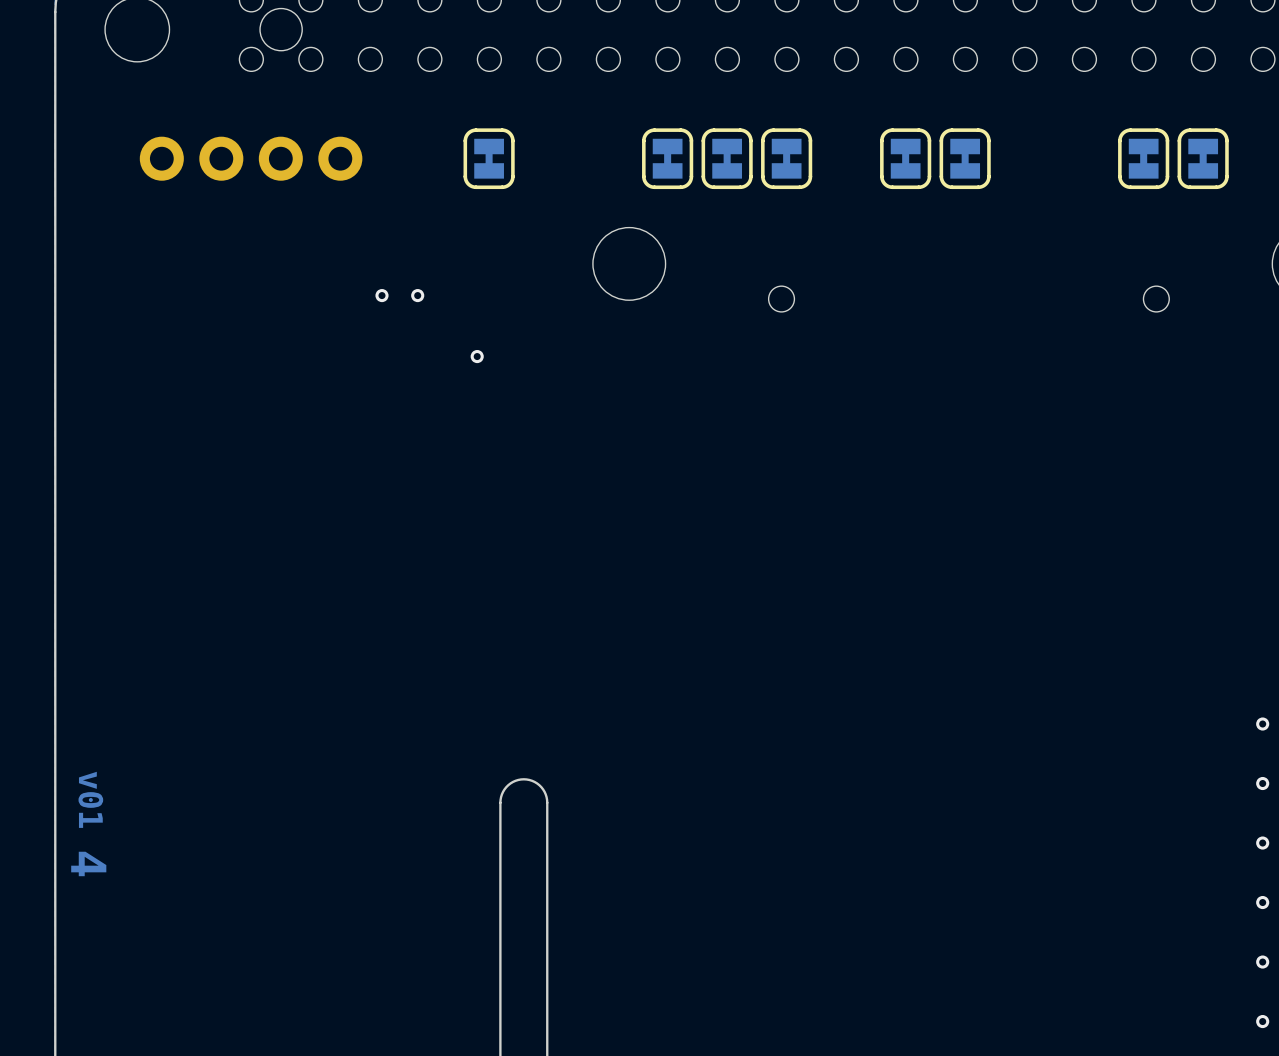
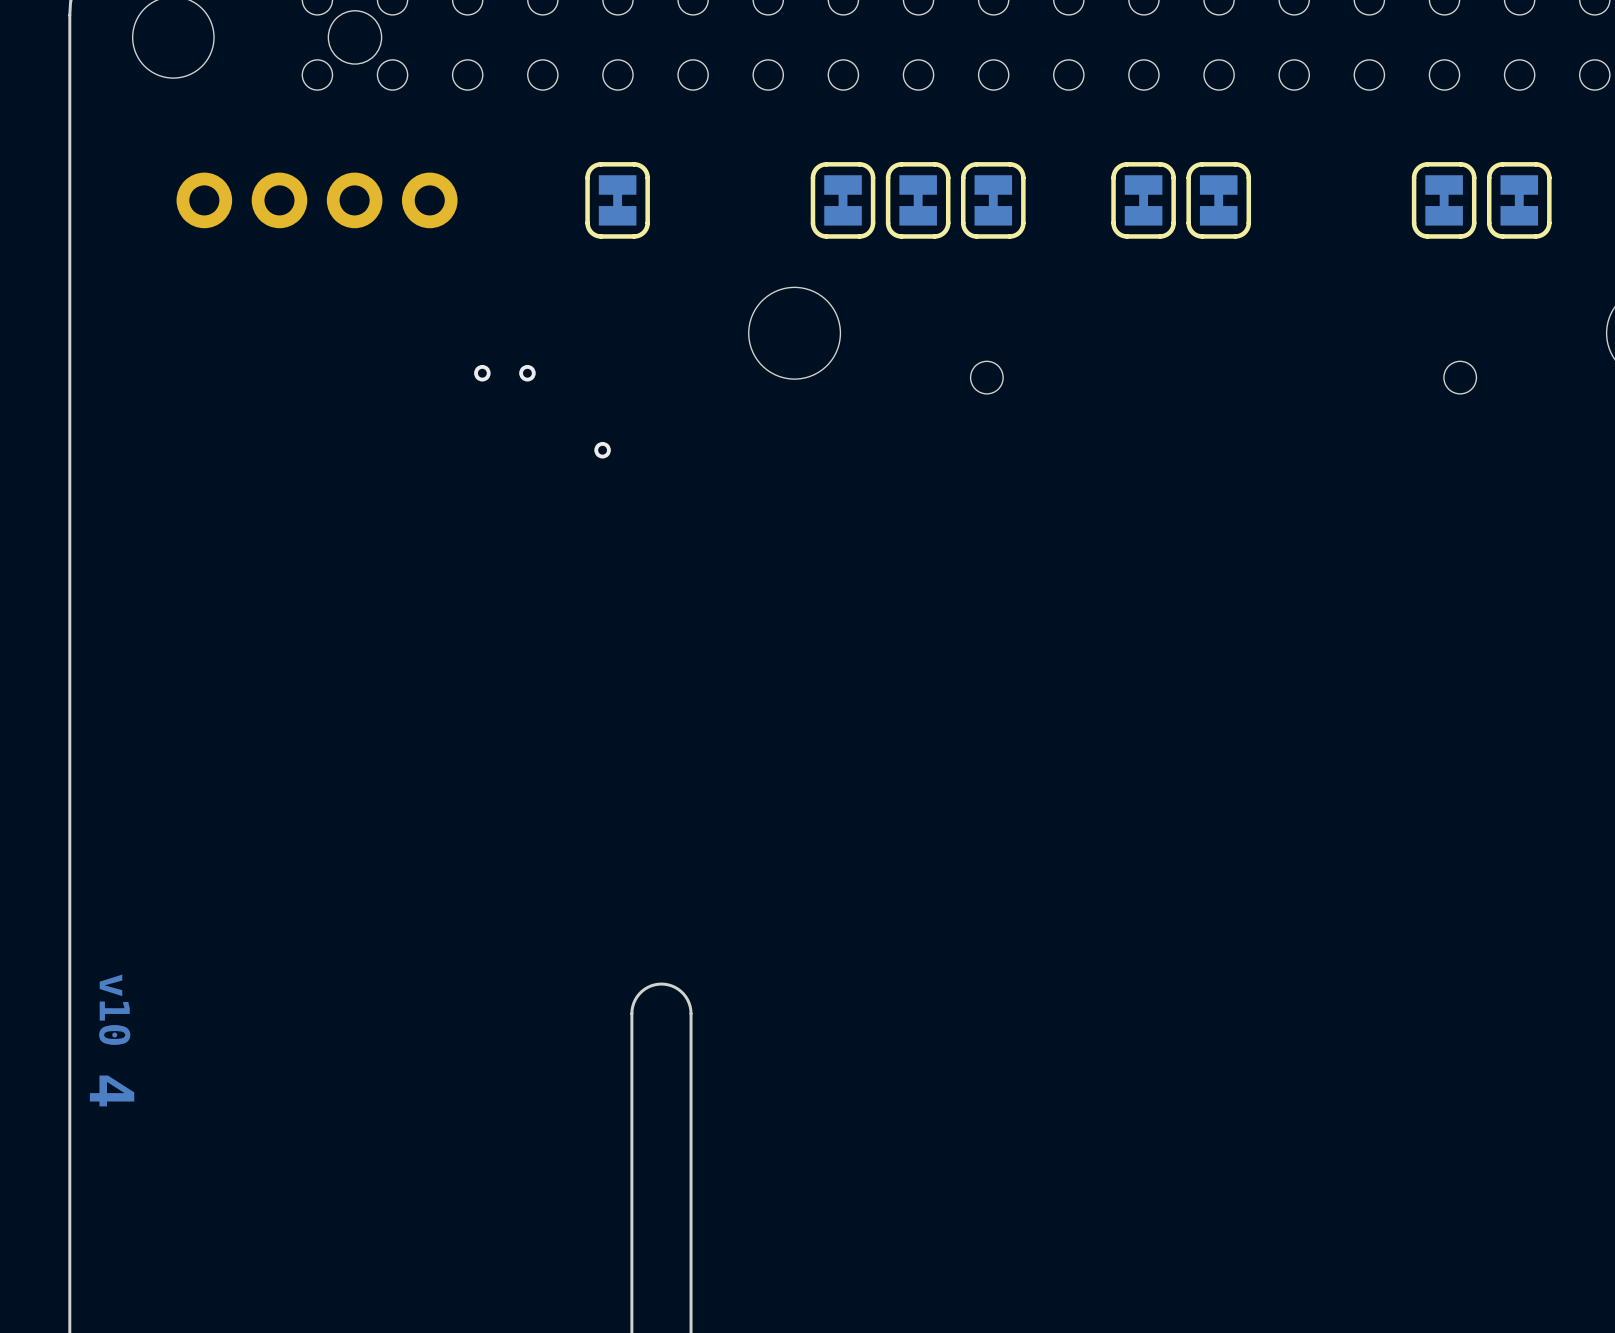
via: (1262, 724) -> none
via: (1262, 783) -> none
text: v01 (90, 799) -> v10 (114, 1009)
via: (1262, 843) -> none
via: (1262, 902) -> none
via: (1262, 962) -> none
via: (1262, 1021) -> none

